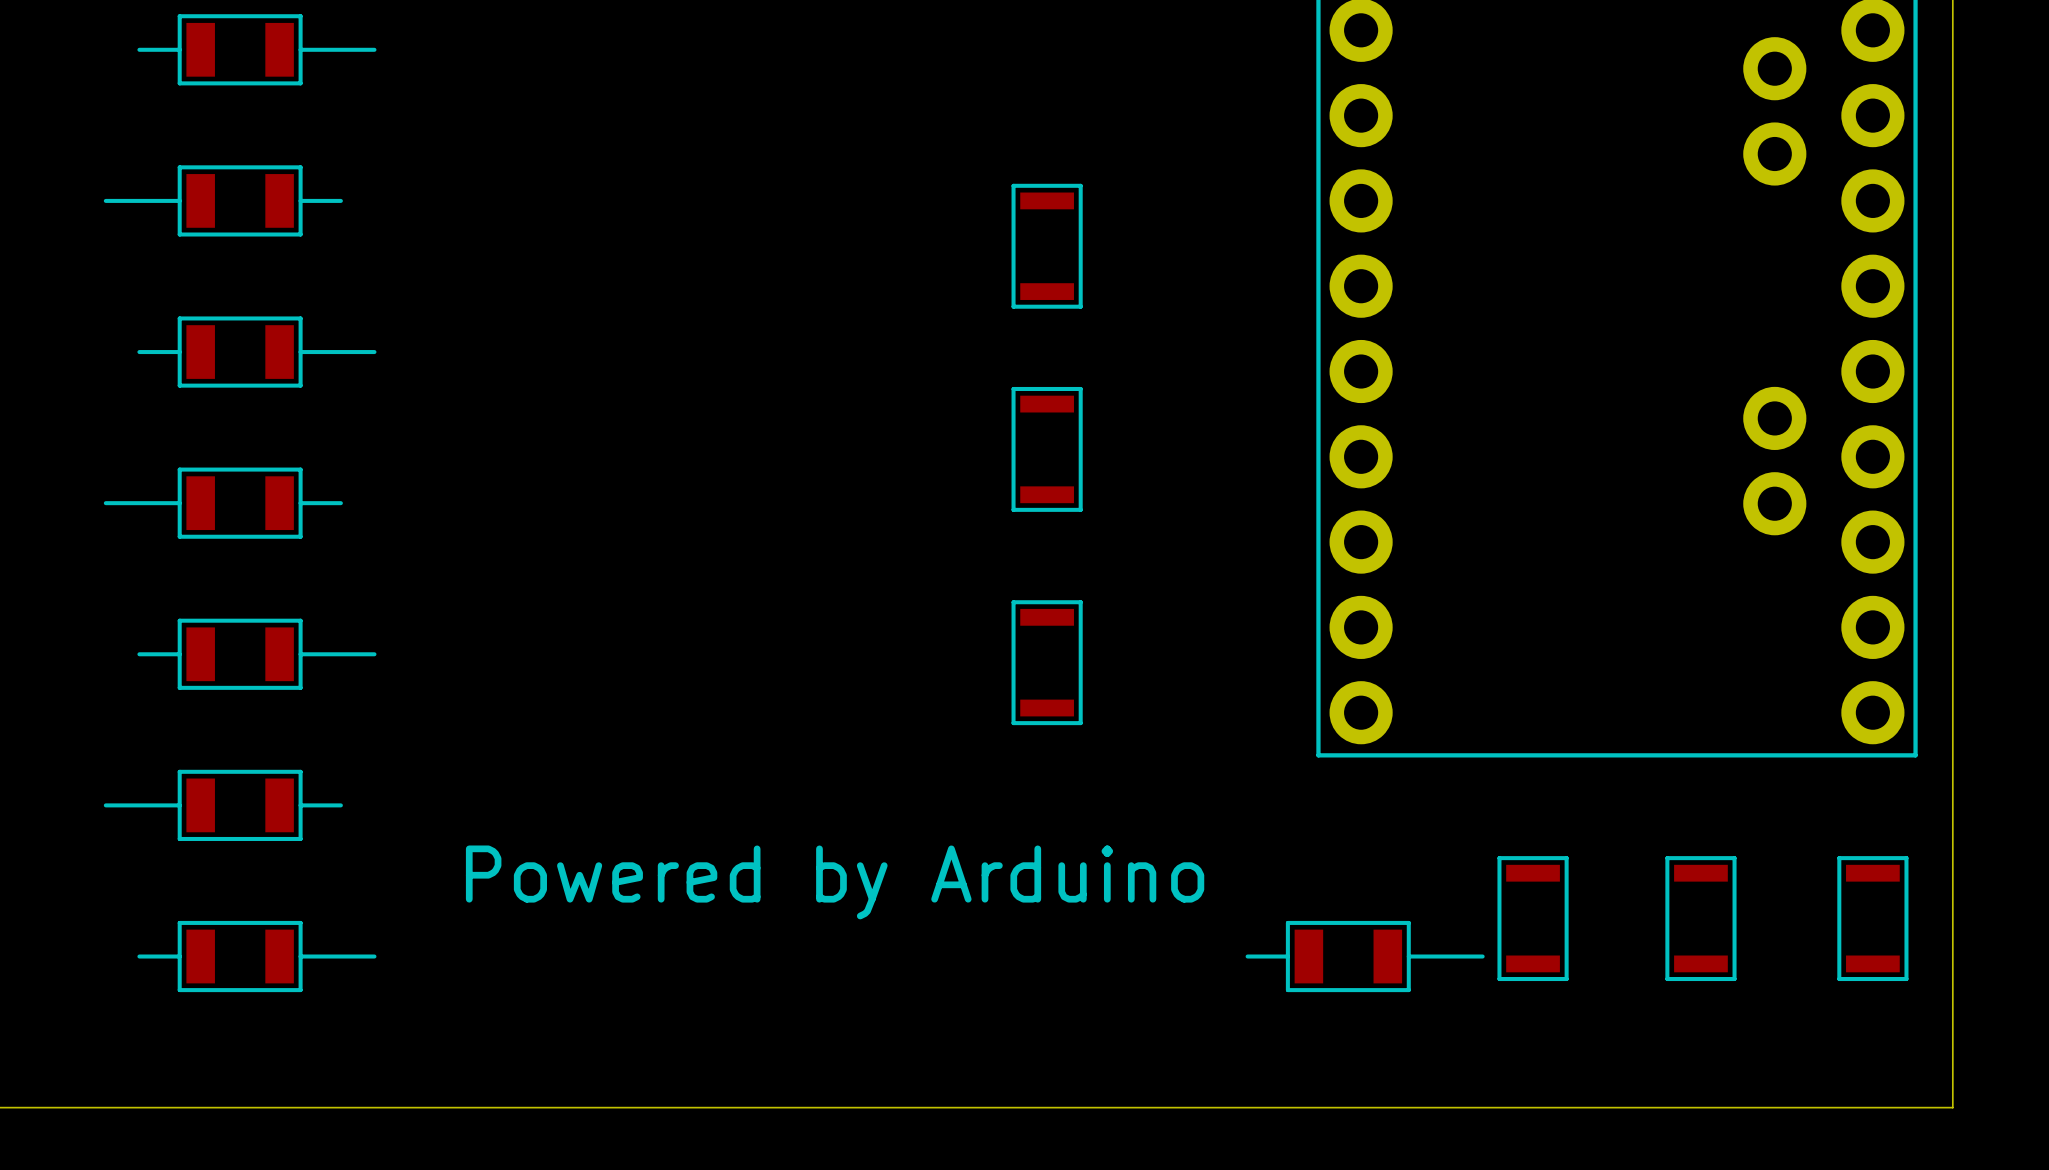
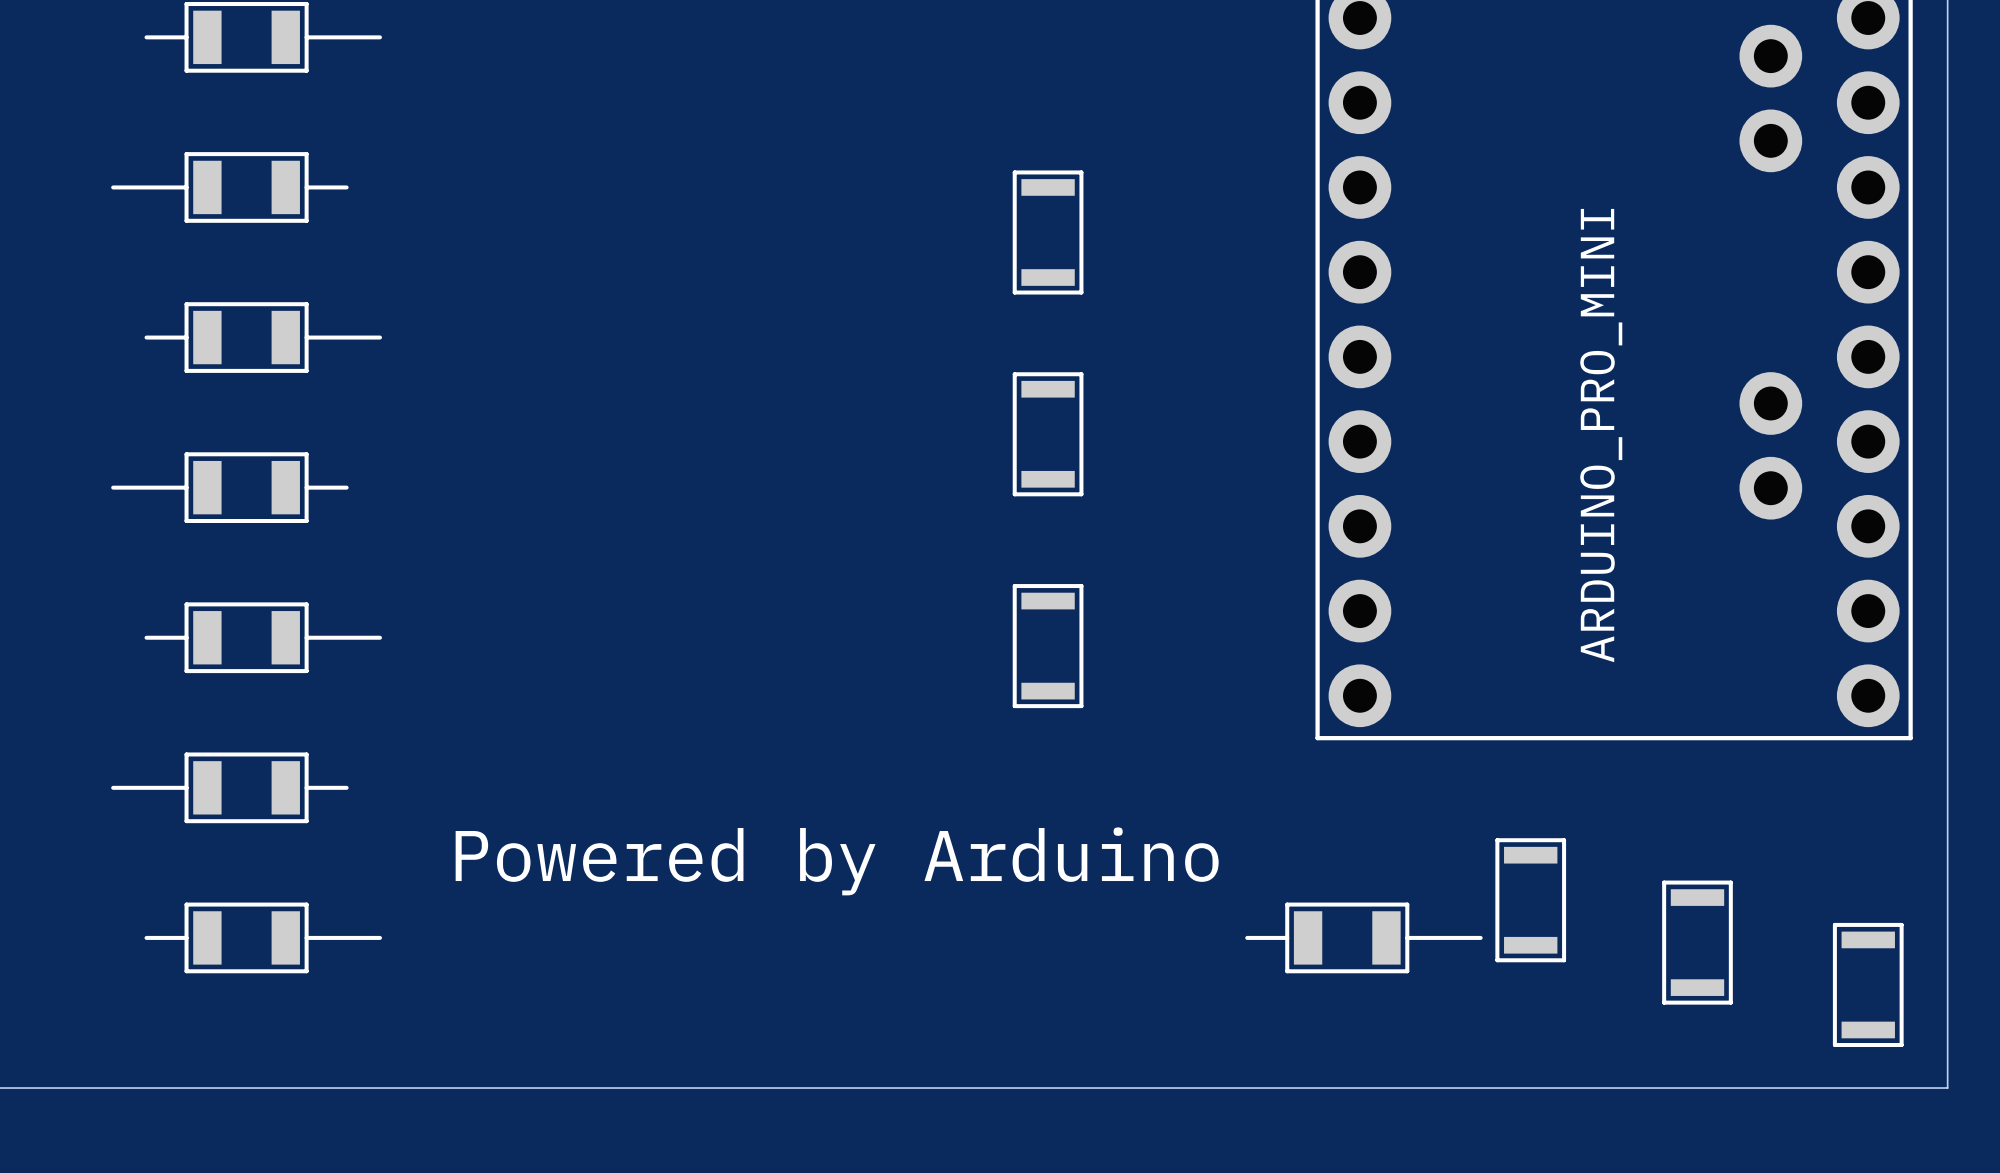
part value: none -> ARDUINO_PRO_MINI (1601, 435)
part position: (1700, 918) -> (1697, 942)
part position: (1872, 918) -> (1868, 984)

